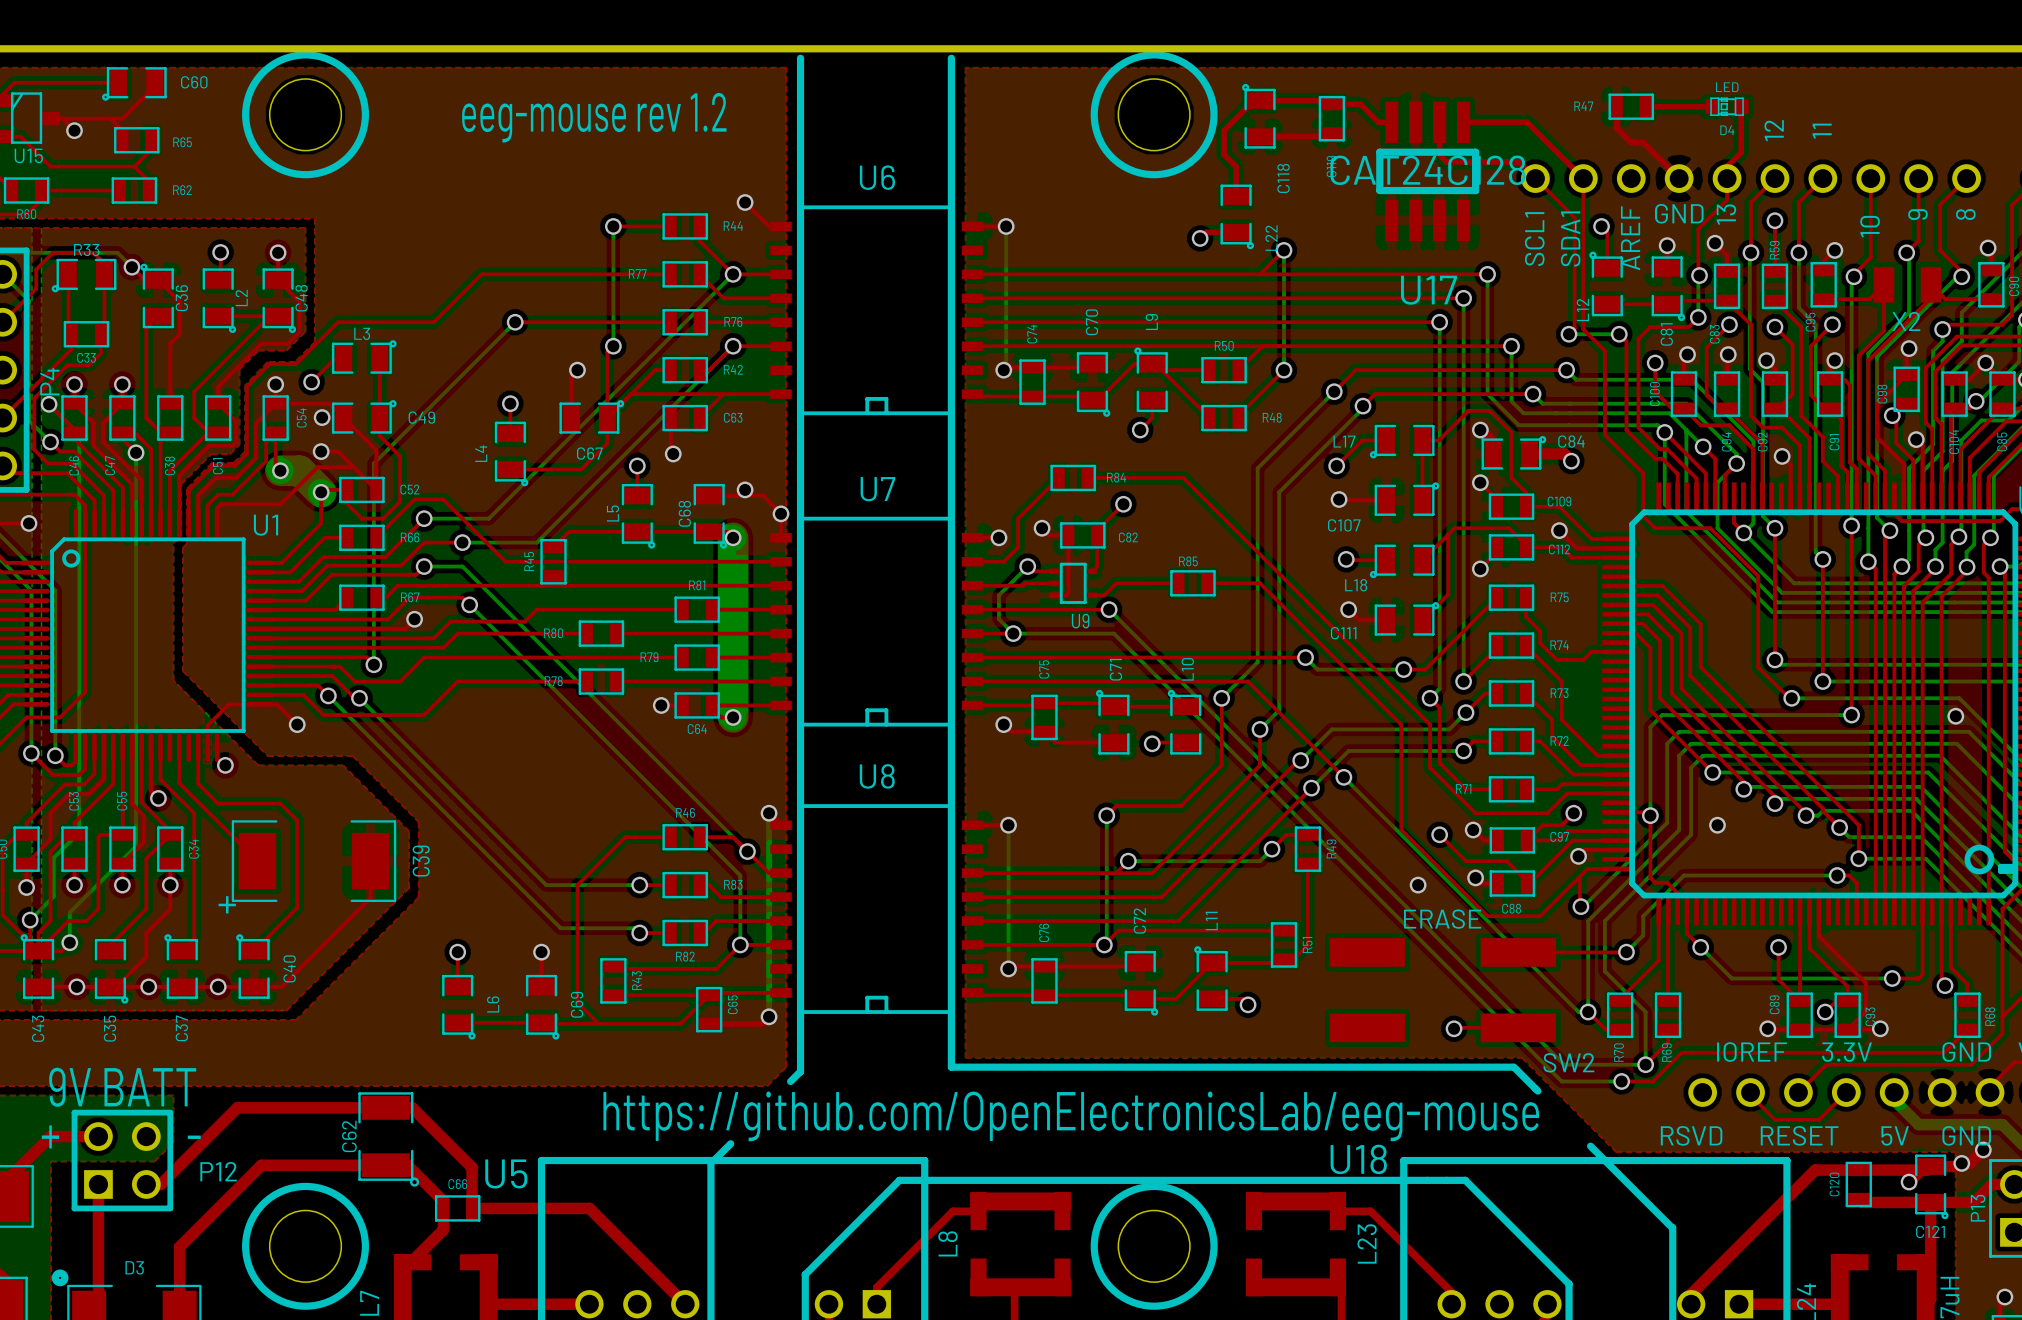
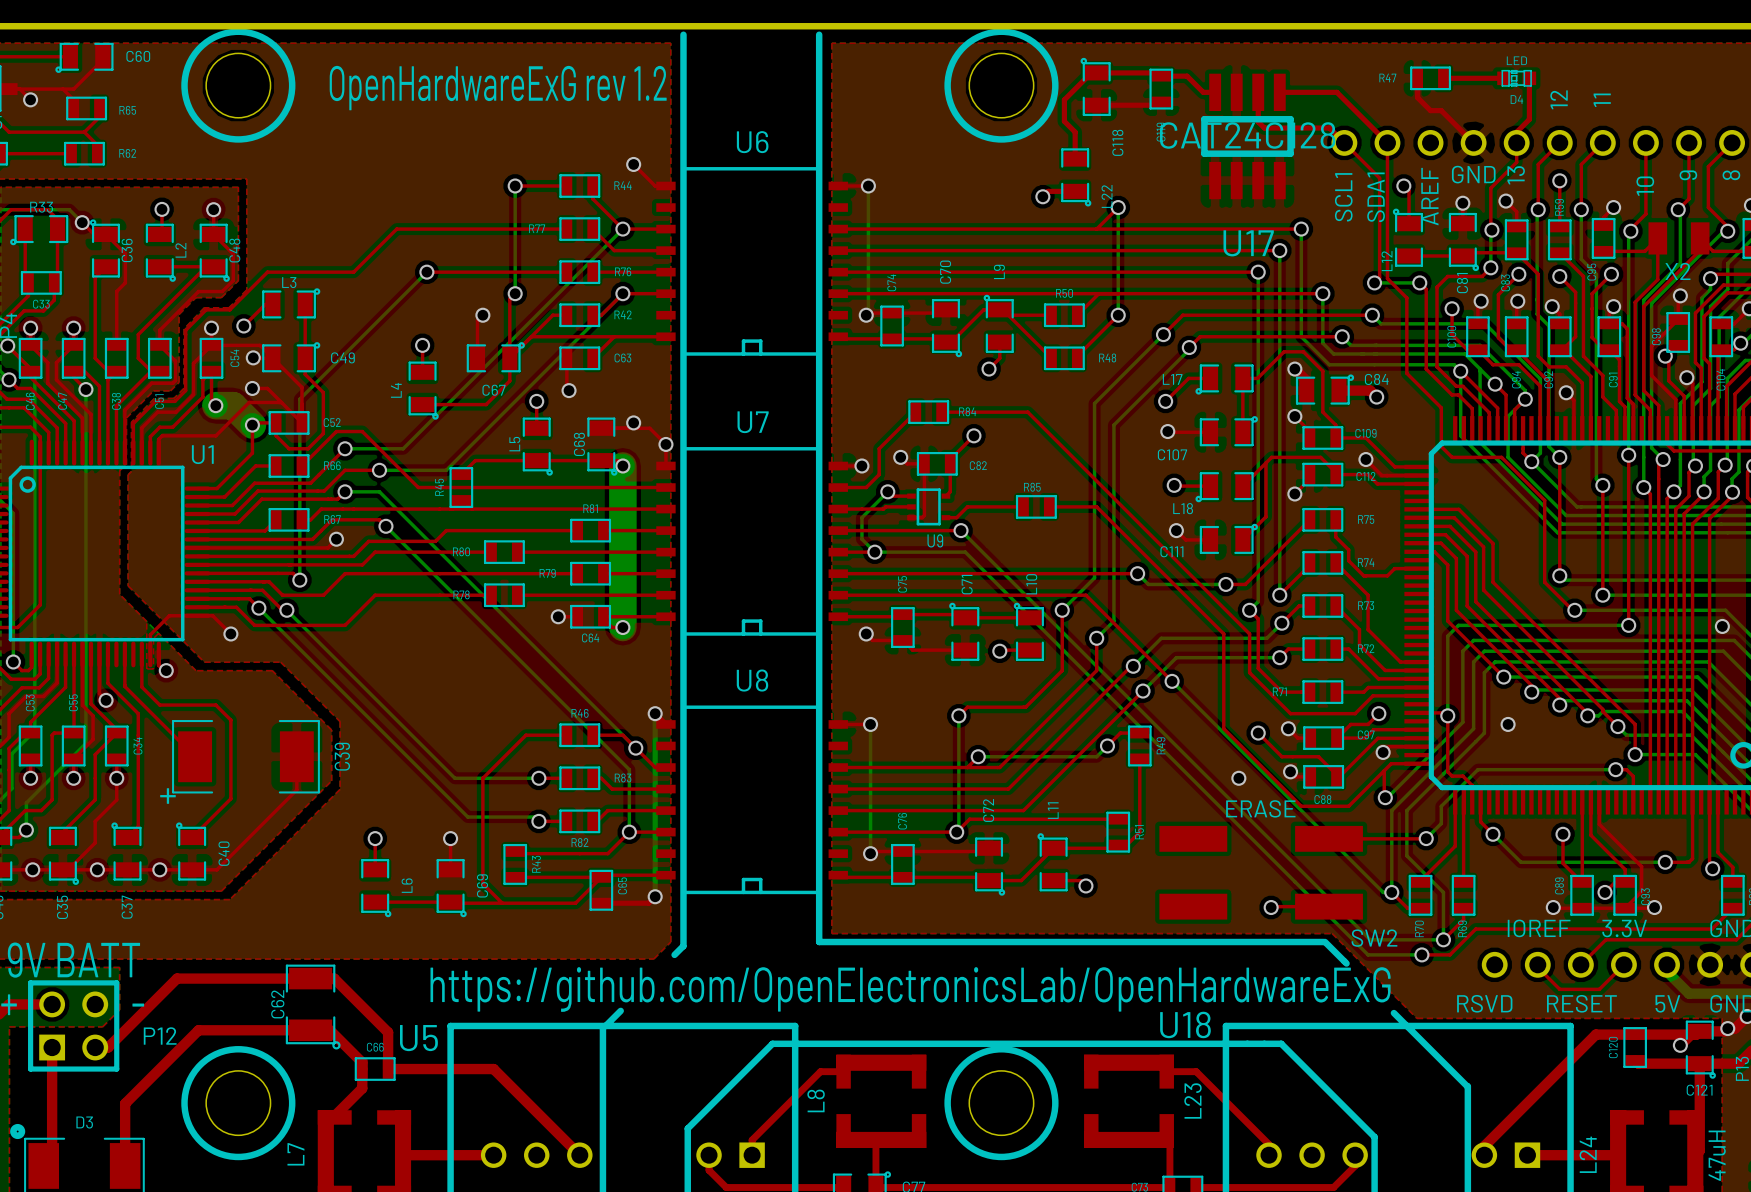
text: eeg-mouse rev 1.2 (594, 117) -> OpenHardwareExG rev 1.2 (498, 88)
text: https://github.com/OpenElectronicsLab/eeg-mouse (1071, 1116) -> https://github.com/OpenElectronicsLab/OpenHardwareExG (910, 989)

